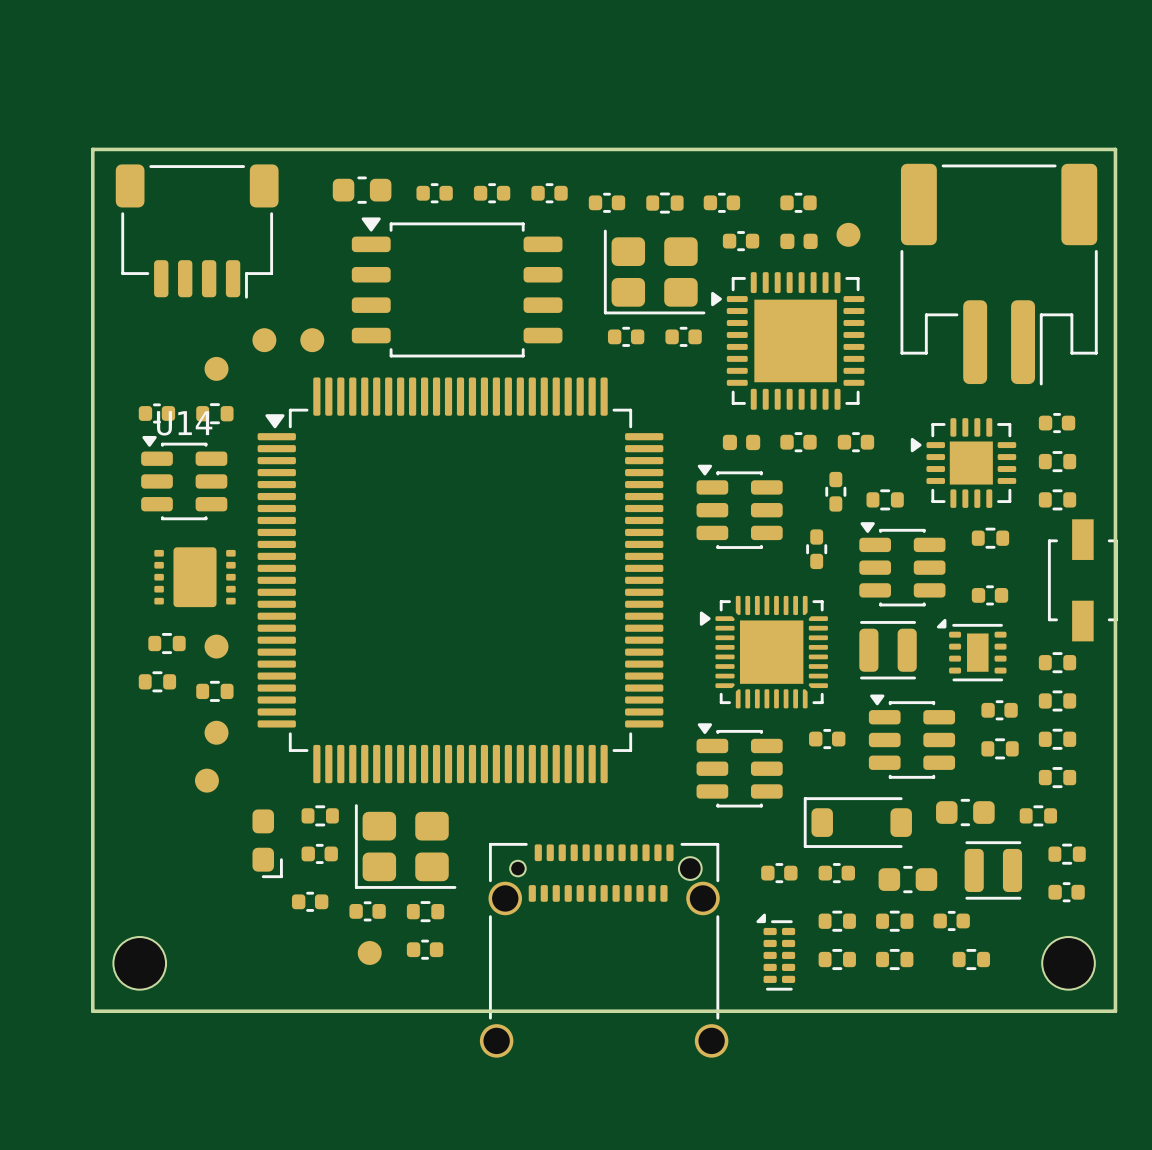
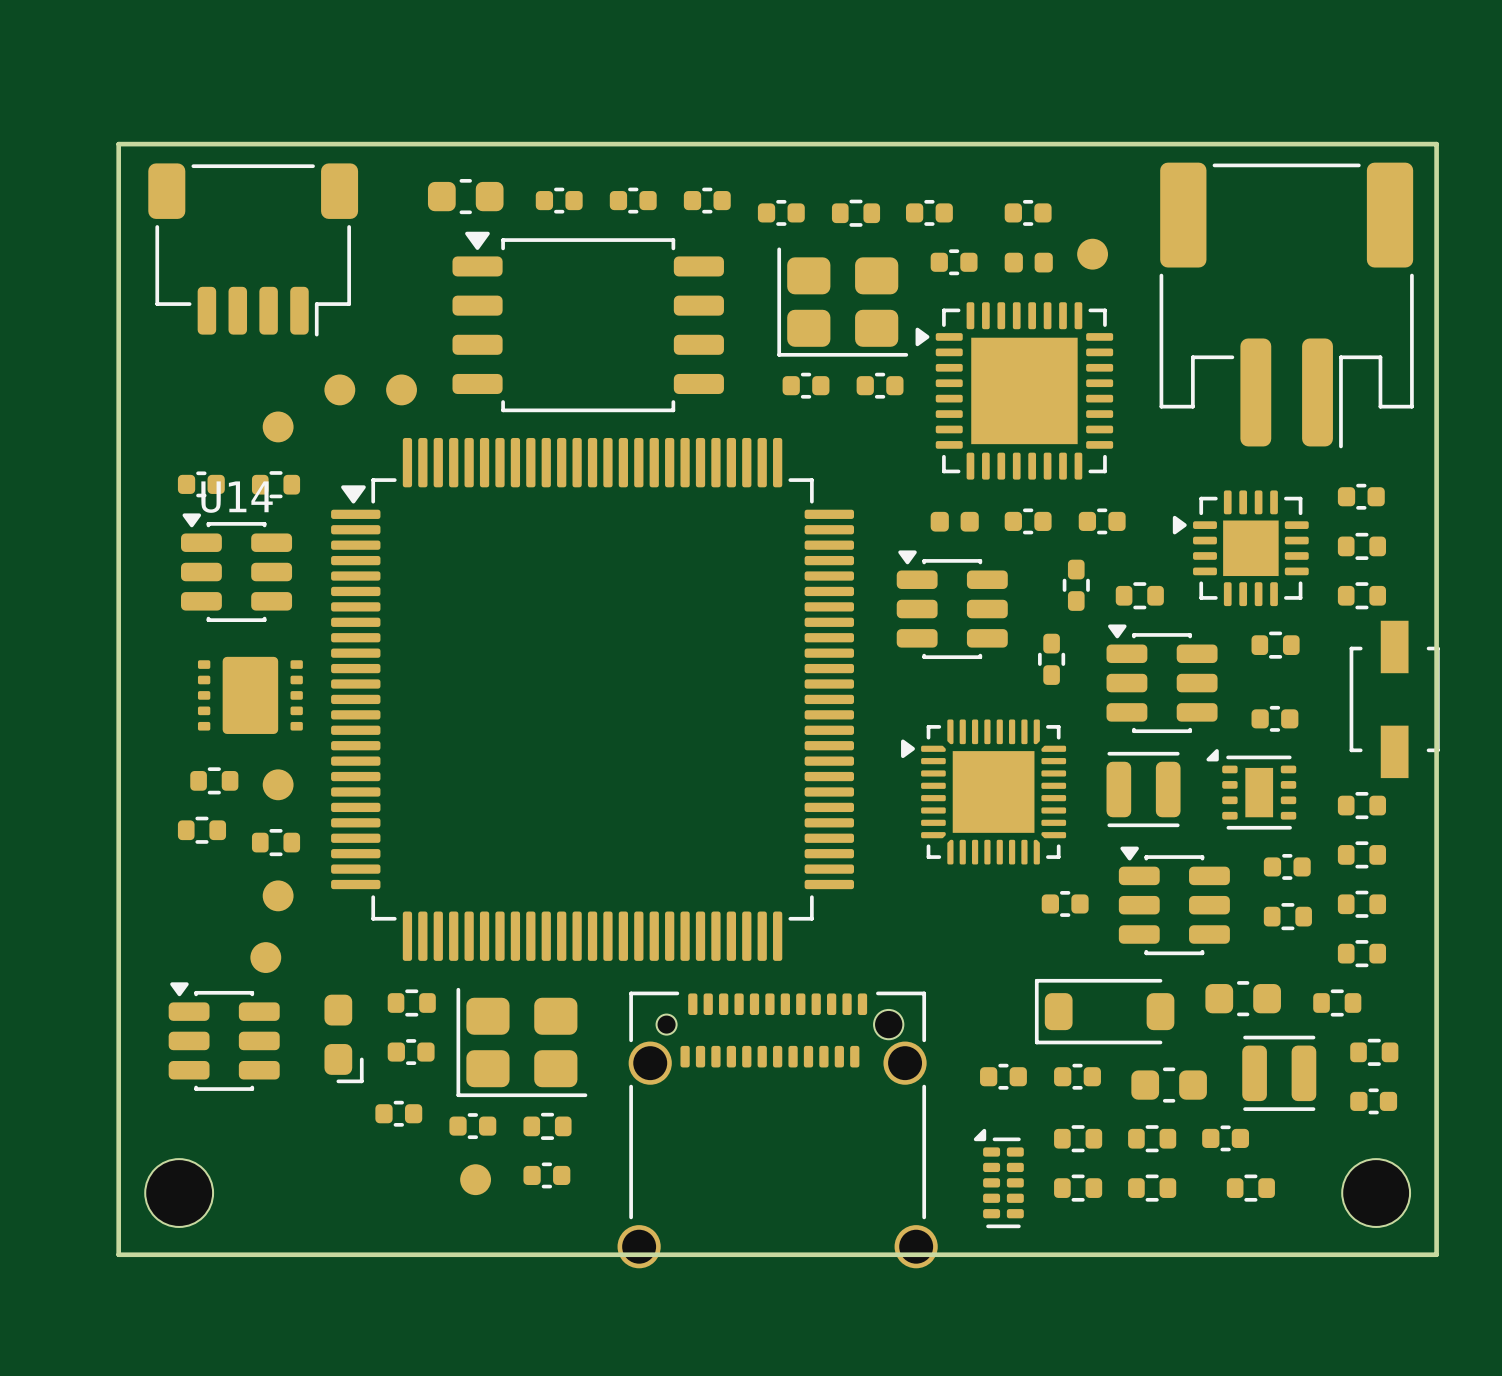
part position: (739, 765) -> (224, 1036)
part position: (604, 950) -> (777, 1129)

